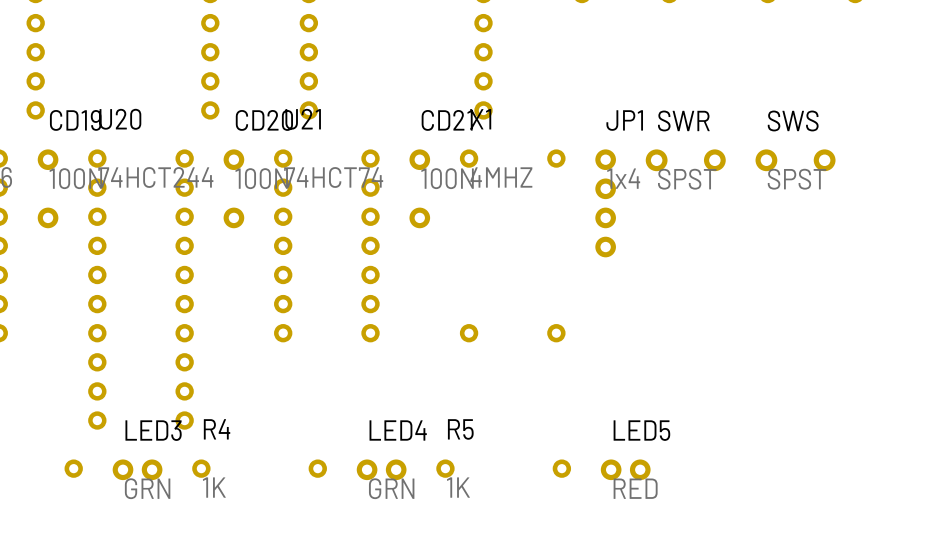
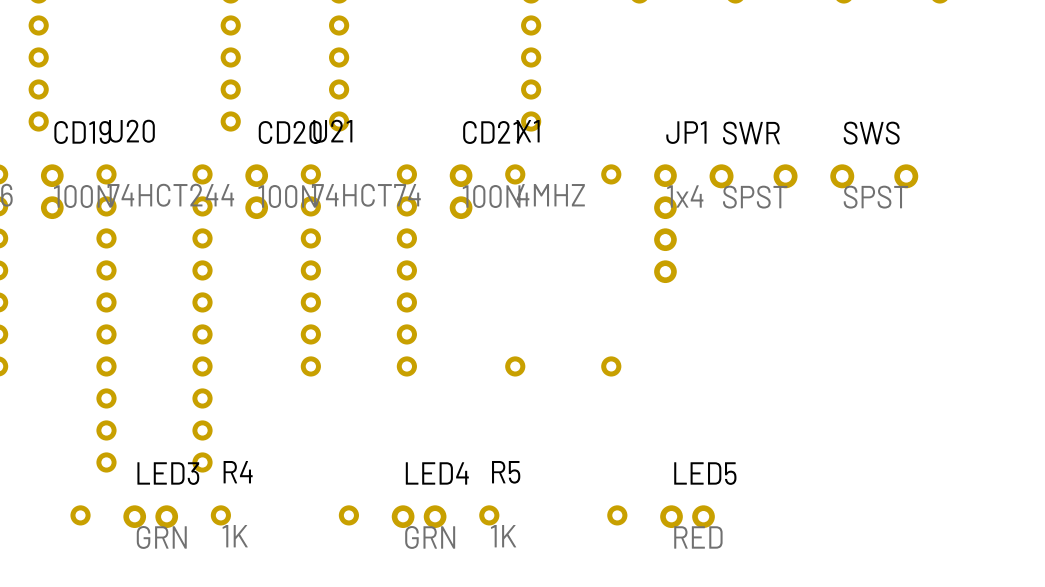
CD19 footprint: [37, 149, 59, 229] -> [40, 164, 64, 220]
CD20 footprint: [223, 149, 245, 229] -> [245, 164, 269, 220]
CD21 footprint: [409, 149, 431, 229] -> [449, 164, 473, 220]

